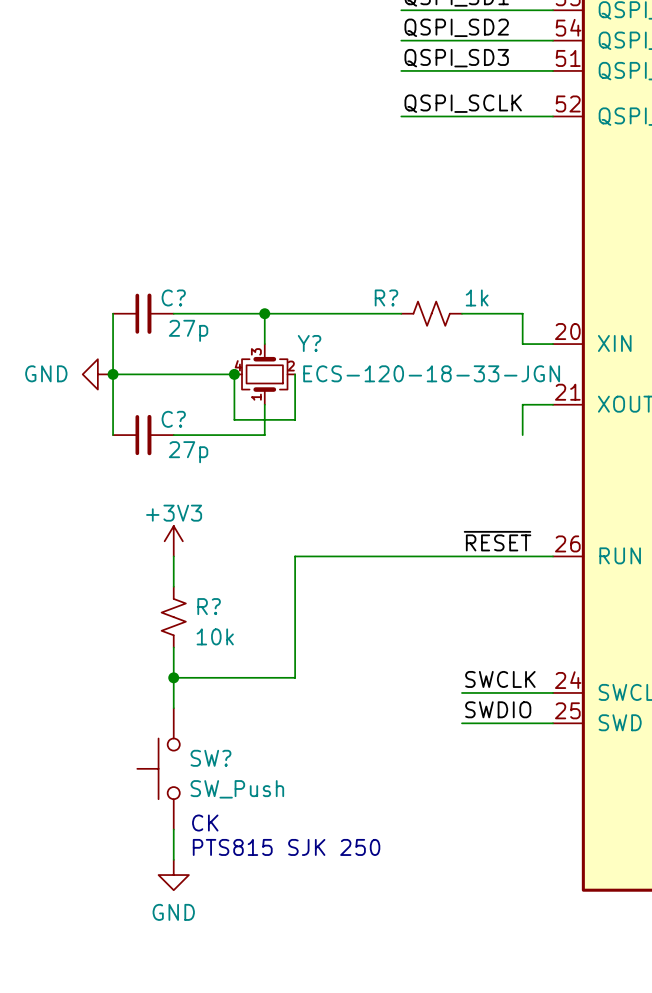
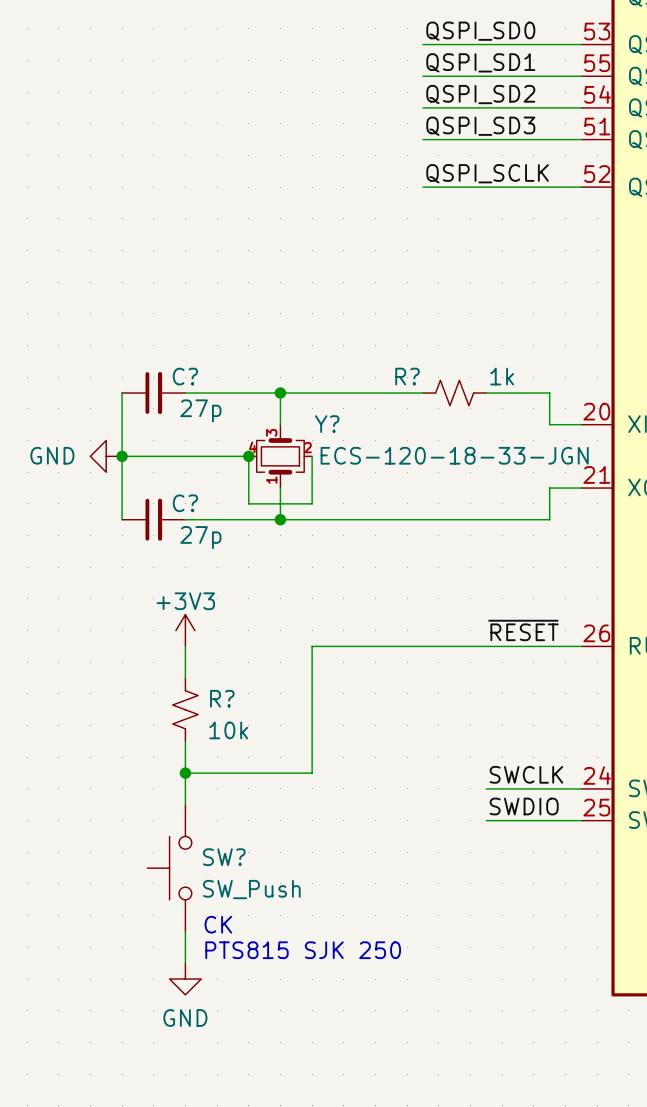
wire: none -> (280, 519) (549, 519)
junction: none -> (280, 519)

